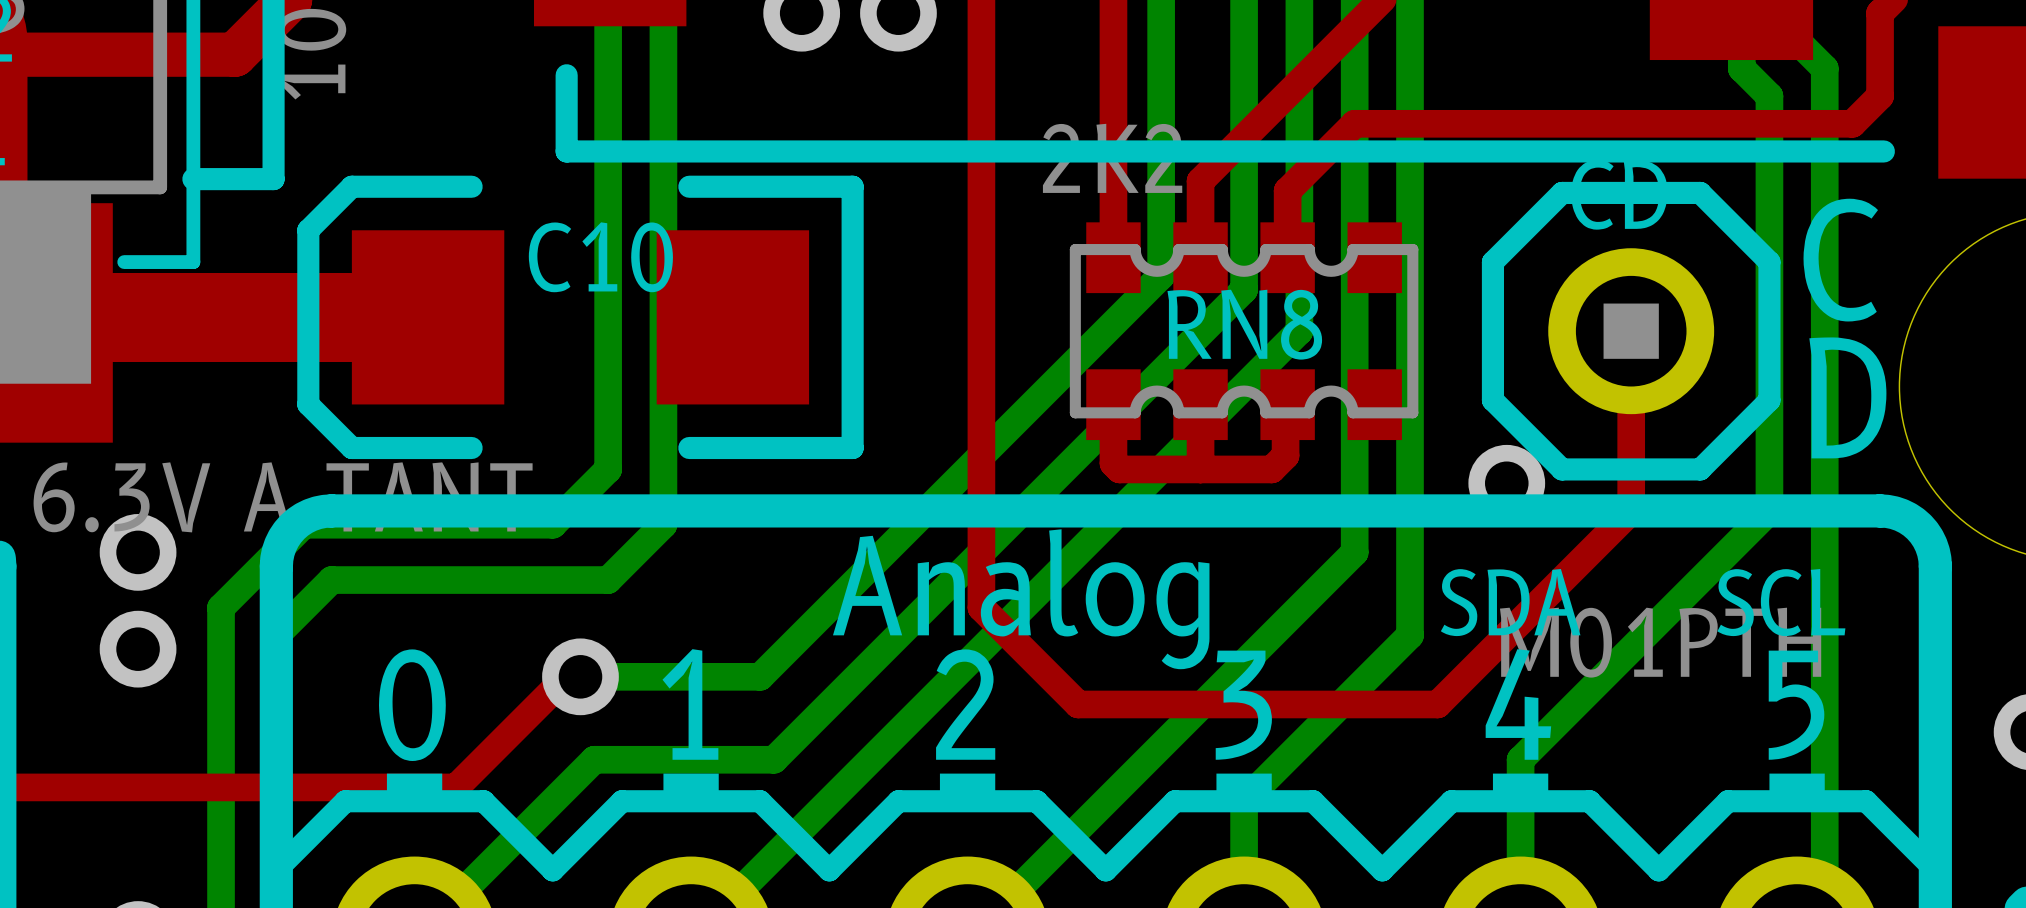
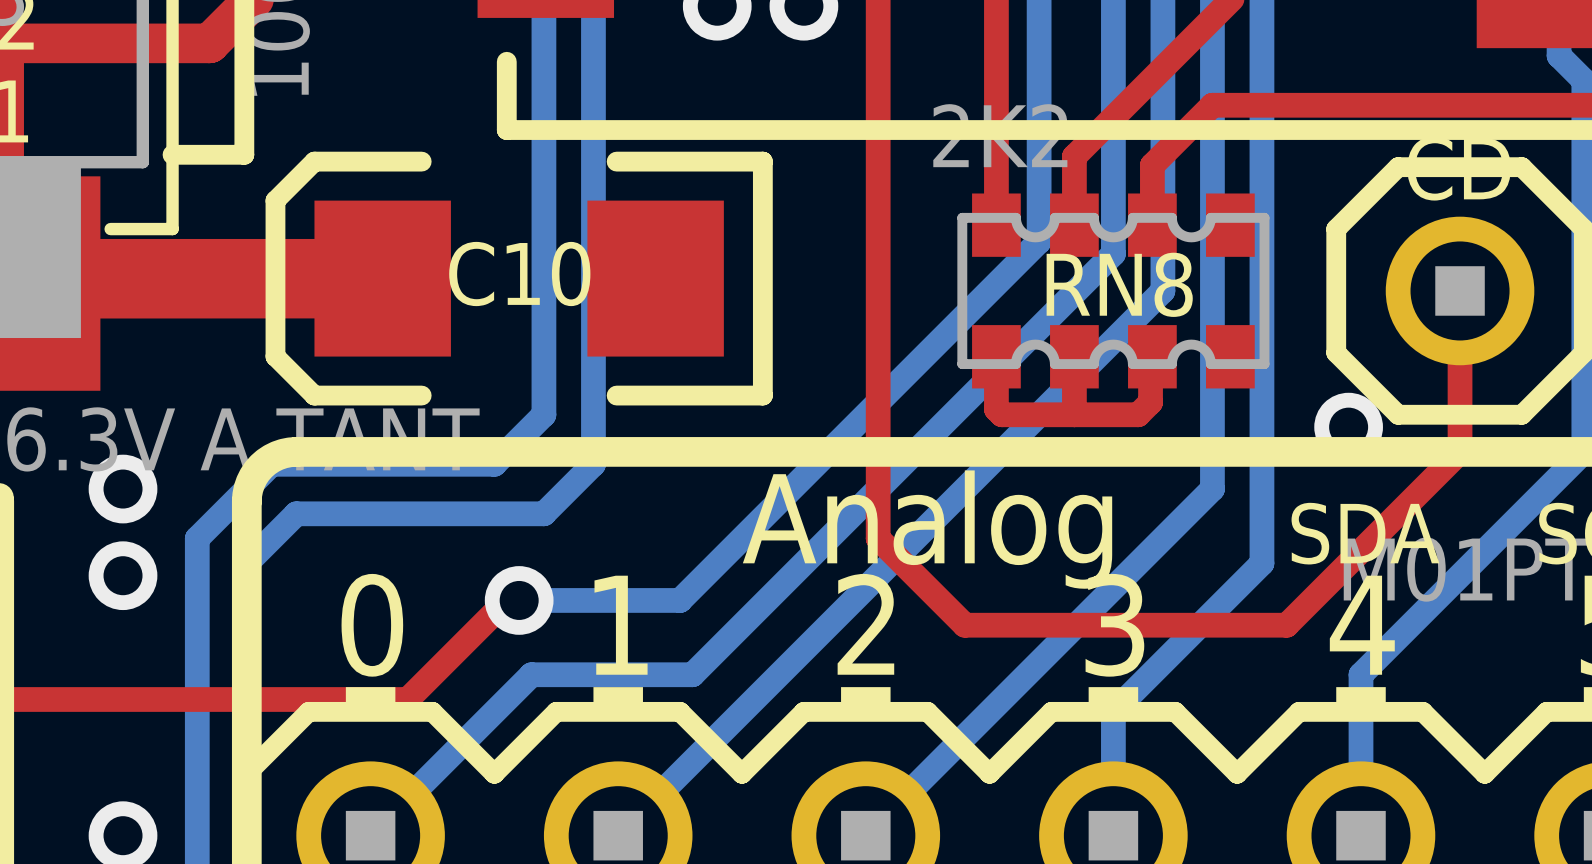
C10 name position: C10 (600, 257) -> C10 (519, 274)

